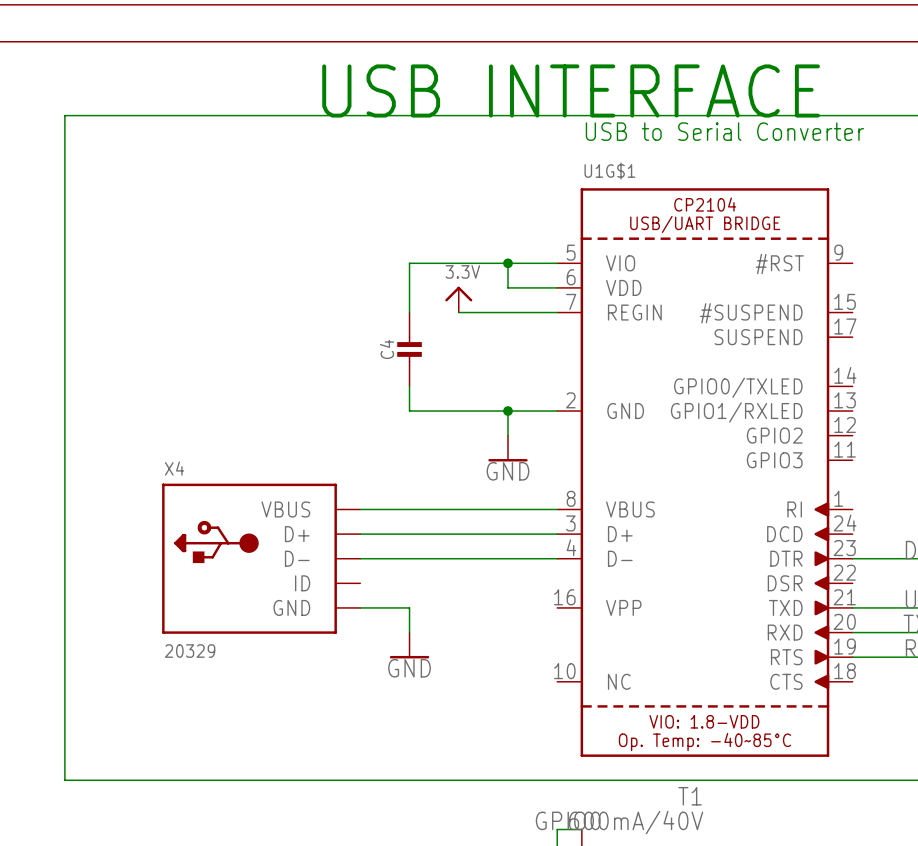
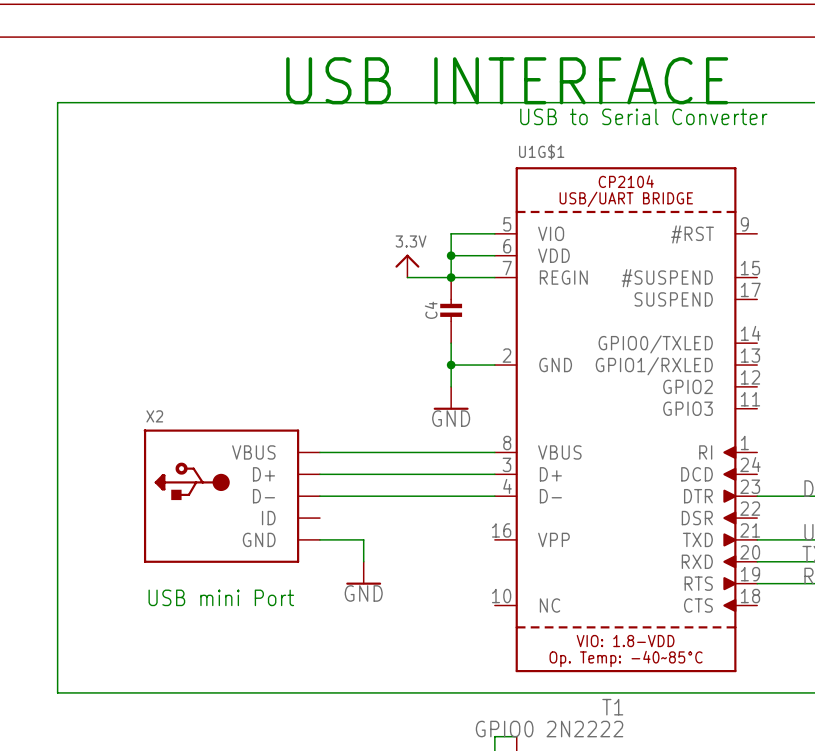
wire: (508, 263) (409, 263) (409, 312) -> none
junction: (508, 263) -> none
wire: none -> (451, 255) (451, 277)
junction: none -> (451, 255)
junction: none -> (451, 277)
C4 position: (409, 349) -> (451, 310)
wire: (409, 386) (409, 411) (508, 411) -> (451, 343) (451, 365)
X4 name: X4 (174, 468) -> X2 (154, 416)
X4 value: 20329 (190, 651) -> none
text: none -> USB mini Port (221, 597)
T1 value: 600mA/40V (636, 822) -> 2N2222 (584, 729)

